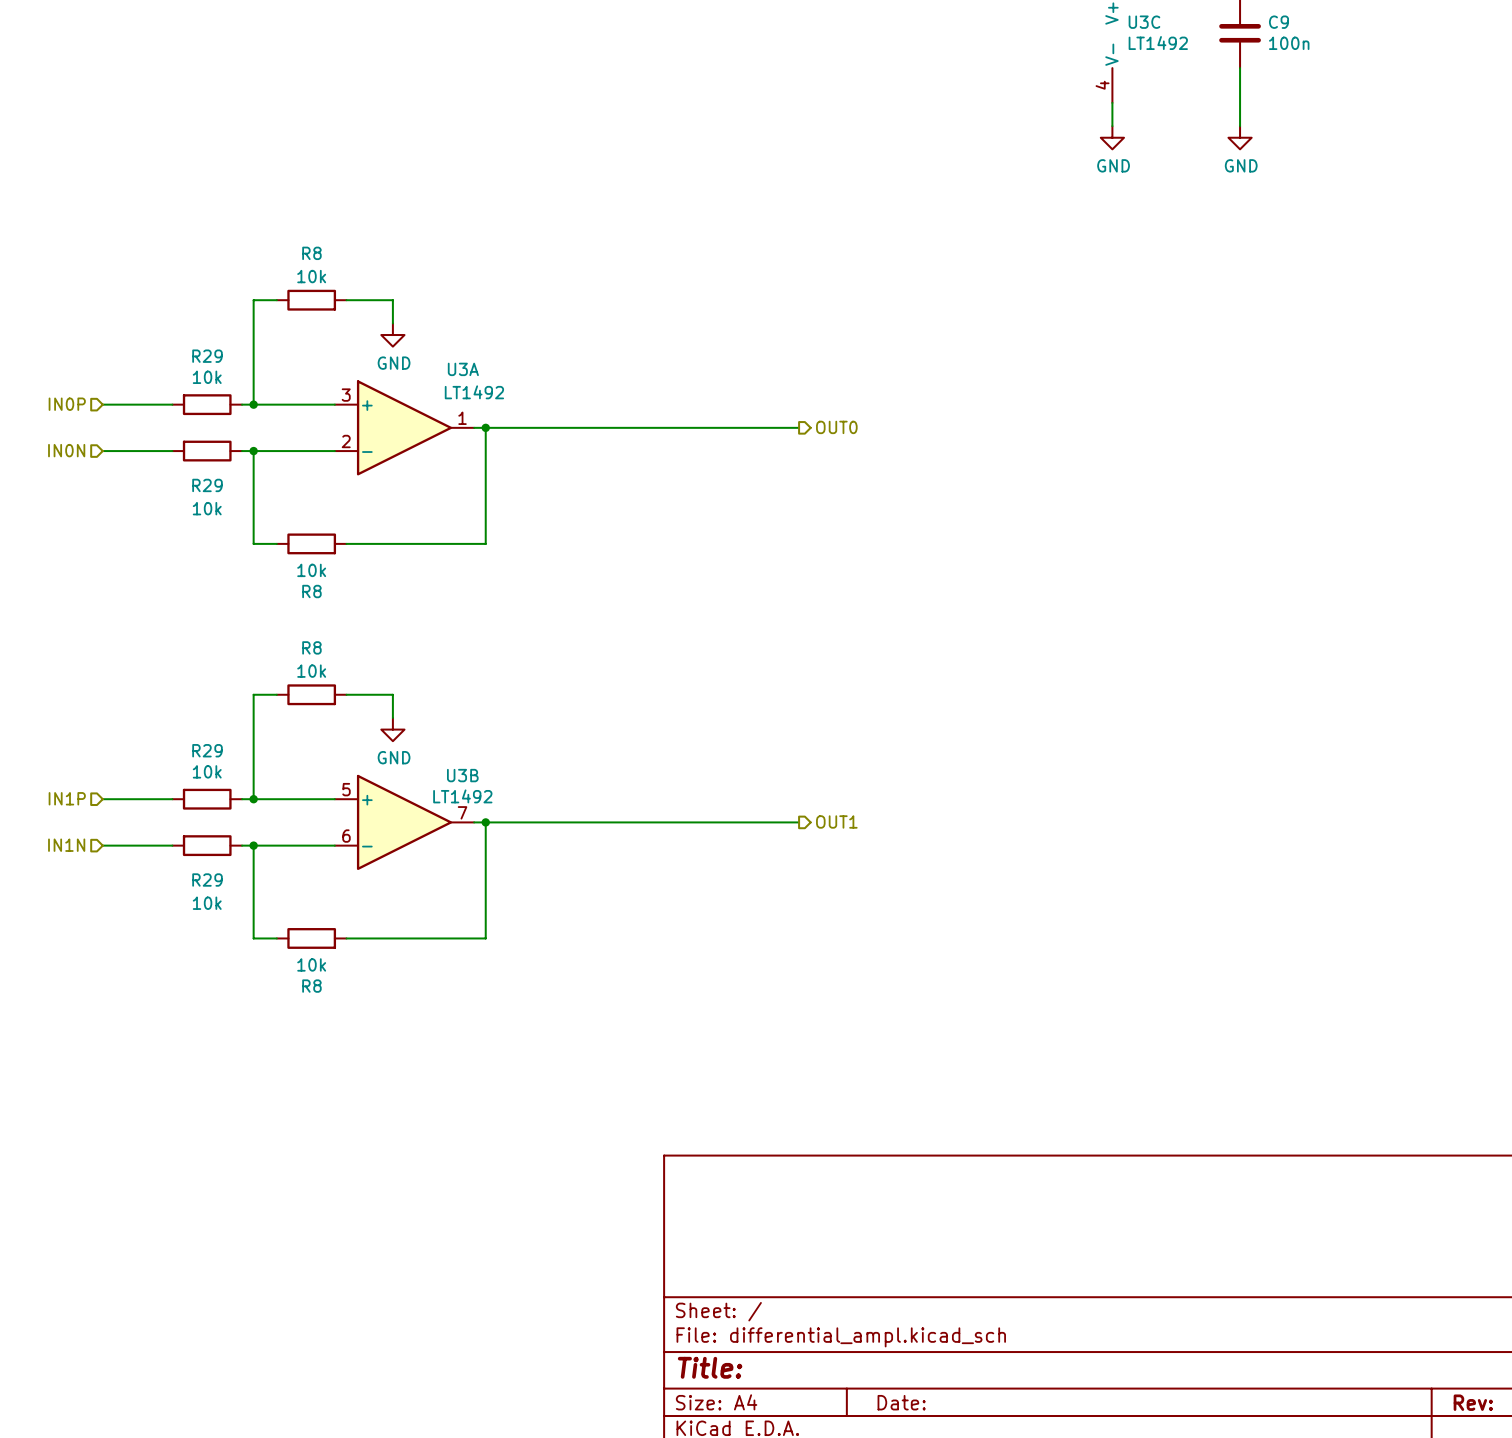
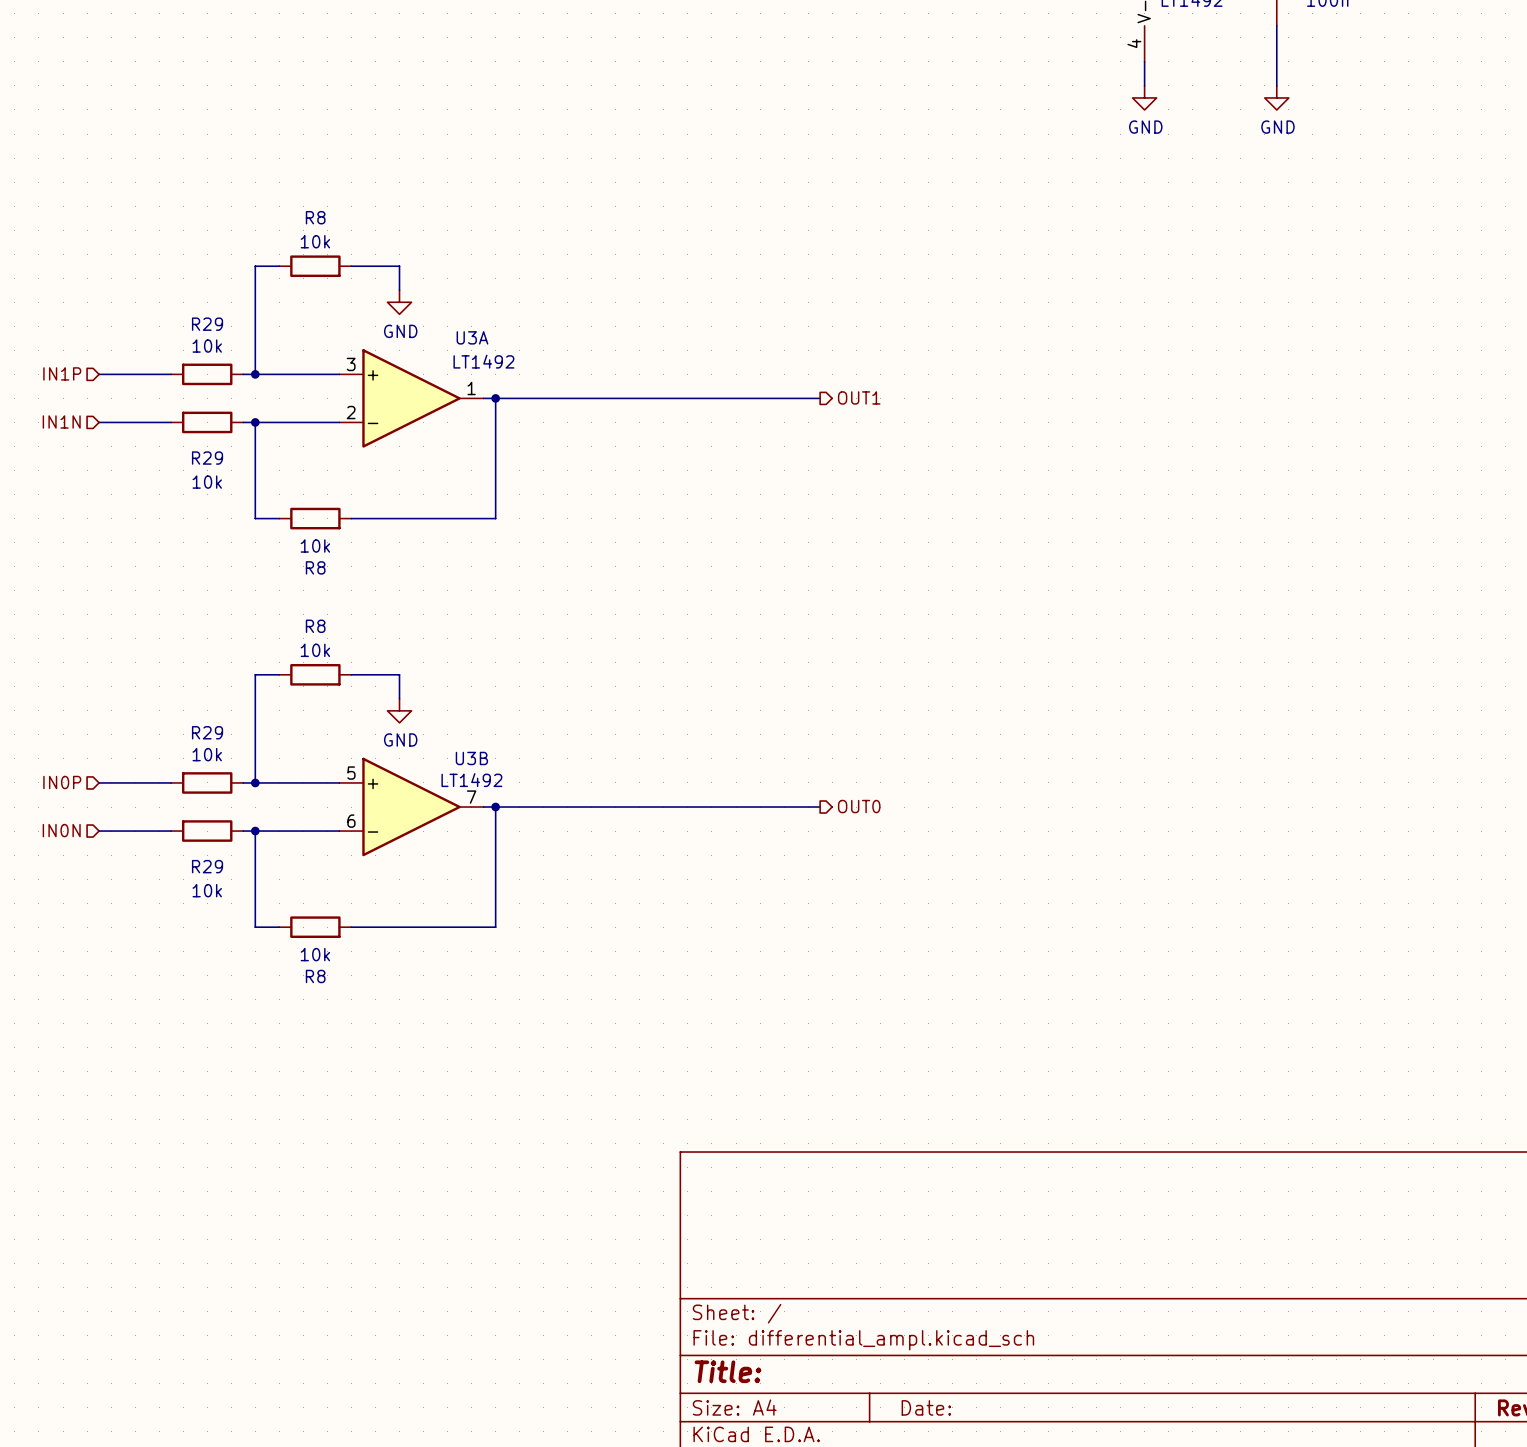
hierarchical label: IN0P (67, 404) -> IN1P (62, 373)
hierarchical label: OUT0 (836, 427) -> OUT1 (859, 397)
hierarchical label: IN0N (66, 450) -> IN1N (61, 421)
hierarchical label: IN1P (67, 798) -> IN0P (62, 782)
hierarchical label: OUT1 (836, 821) -> OUT0 (859, 806)
hierarchical label: IN1N (66, 845) -> IN0N (61, 830)

